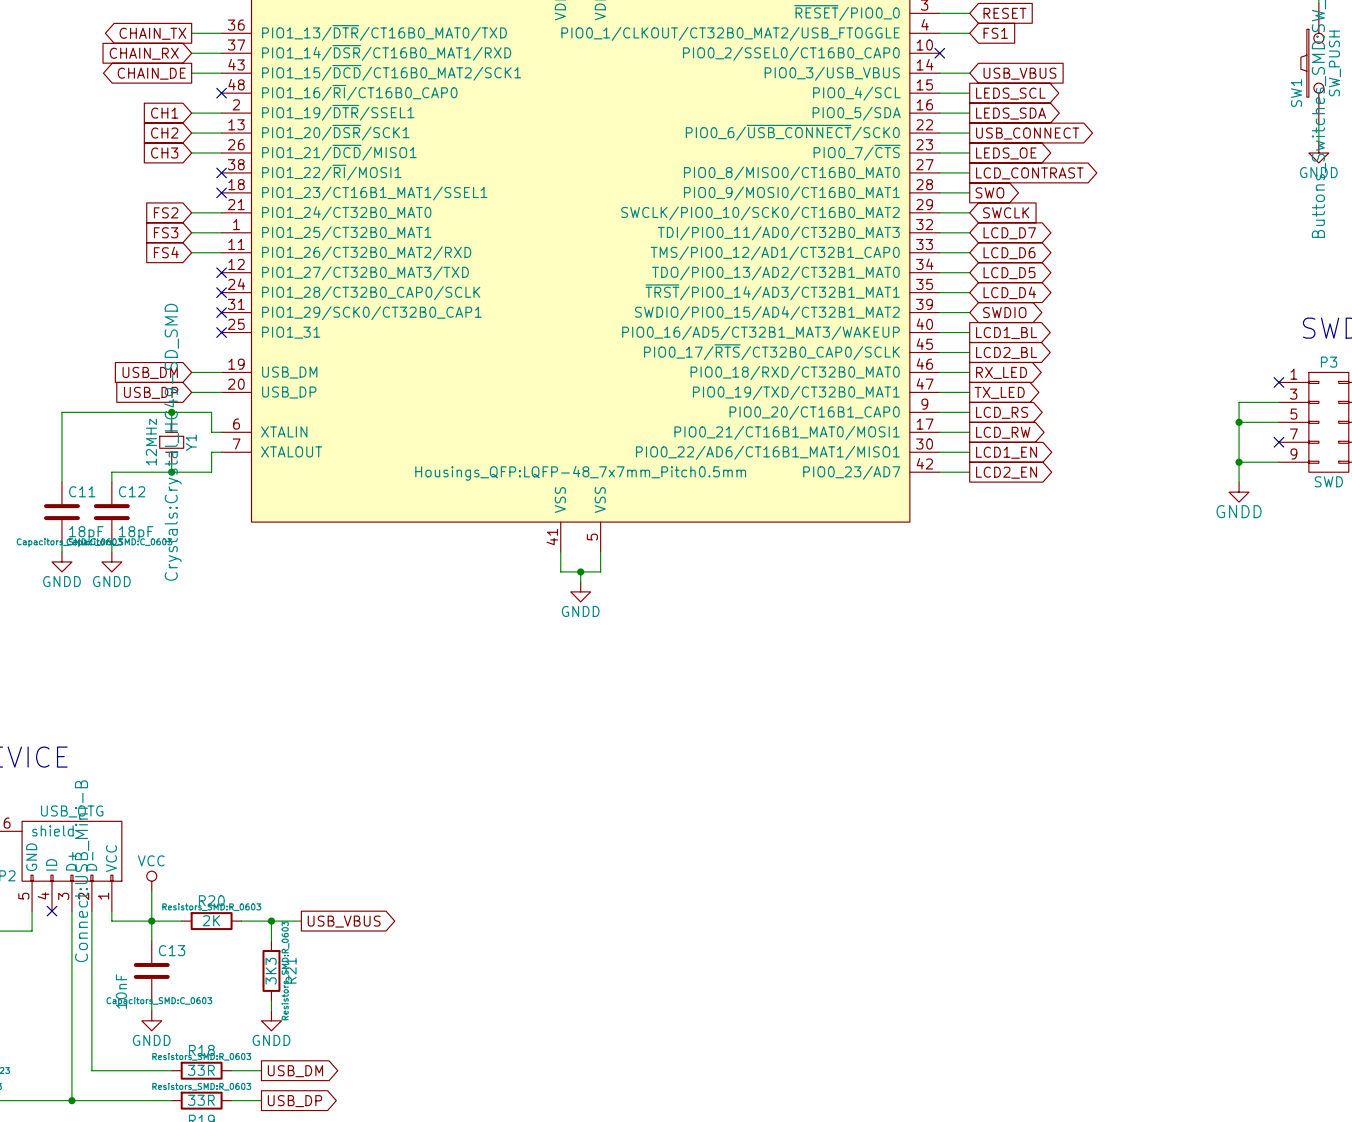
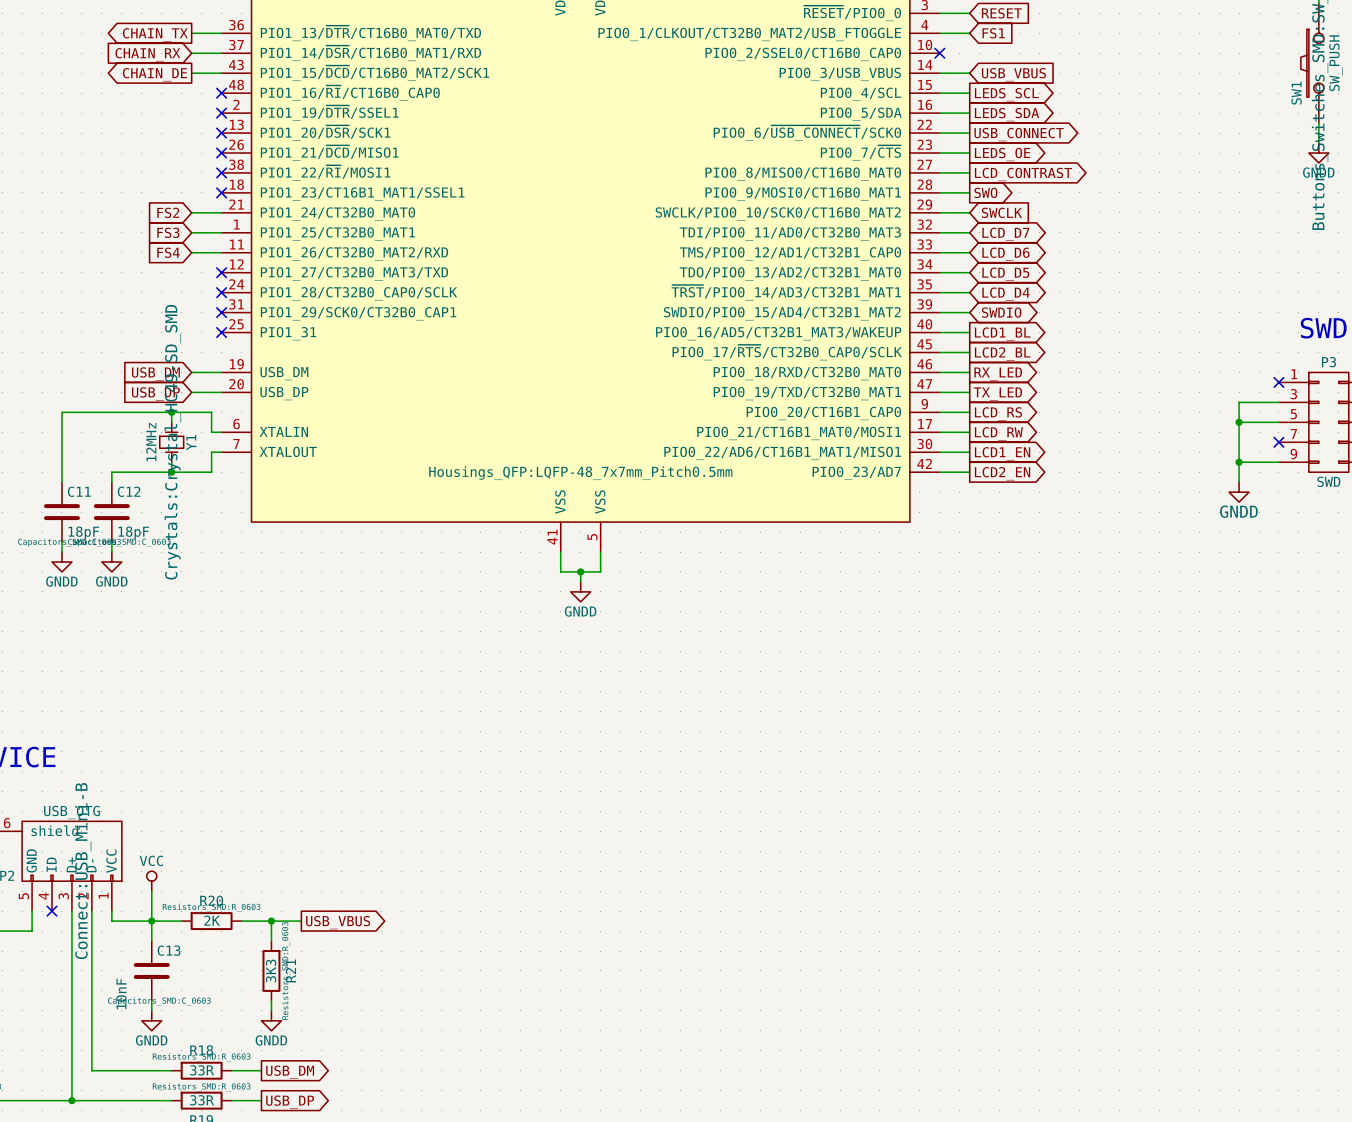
global label: CH1 (164, 113) -> none
wire: (191, 113) (221, 113) -> none
no-connect mark: none -> (221, 113)
global label: CH2 (164, 133) -> none
wire: (191, 133) (221, 133) -> none
no-connect mark: none -> (221, 133)
global label: CH3 (164, 153) -> none
wire: (191, 153) (221, 153) -> none
no-connect mark: none -> (221, 153)

